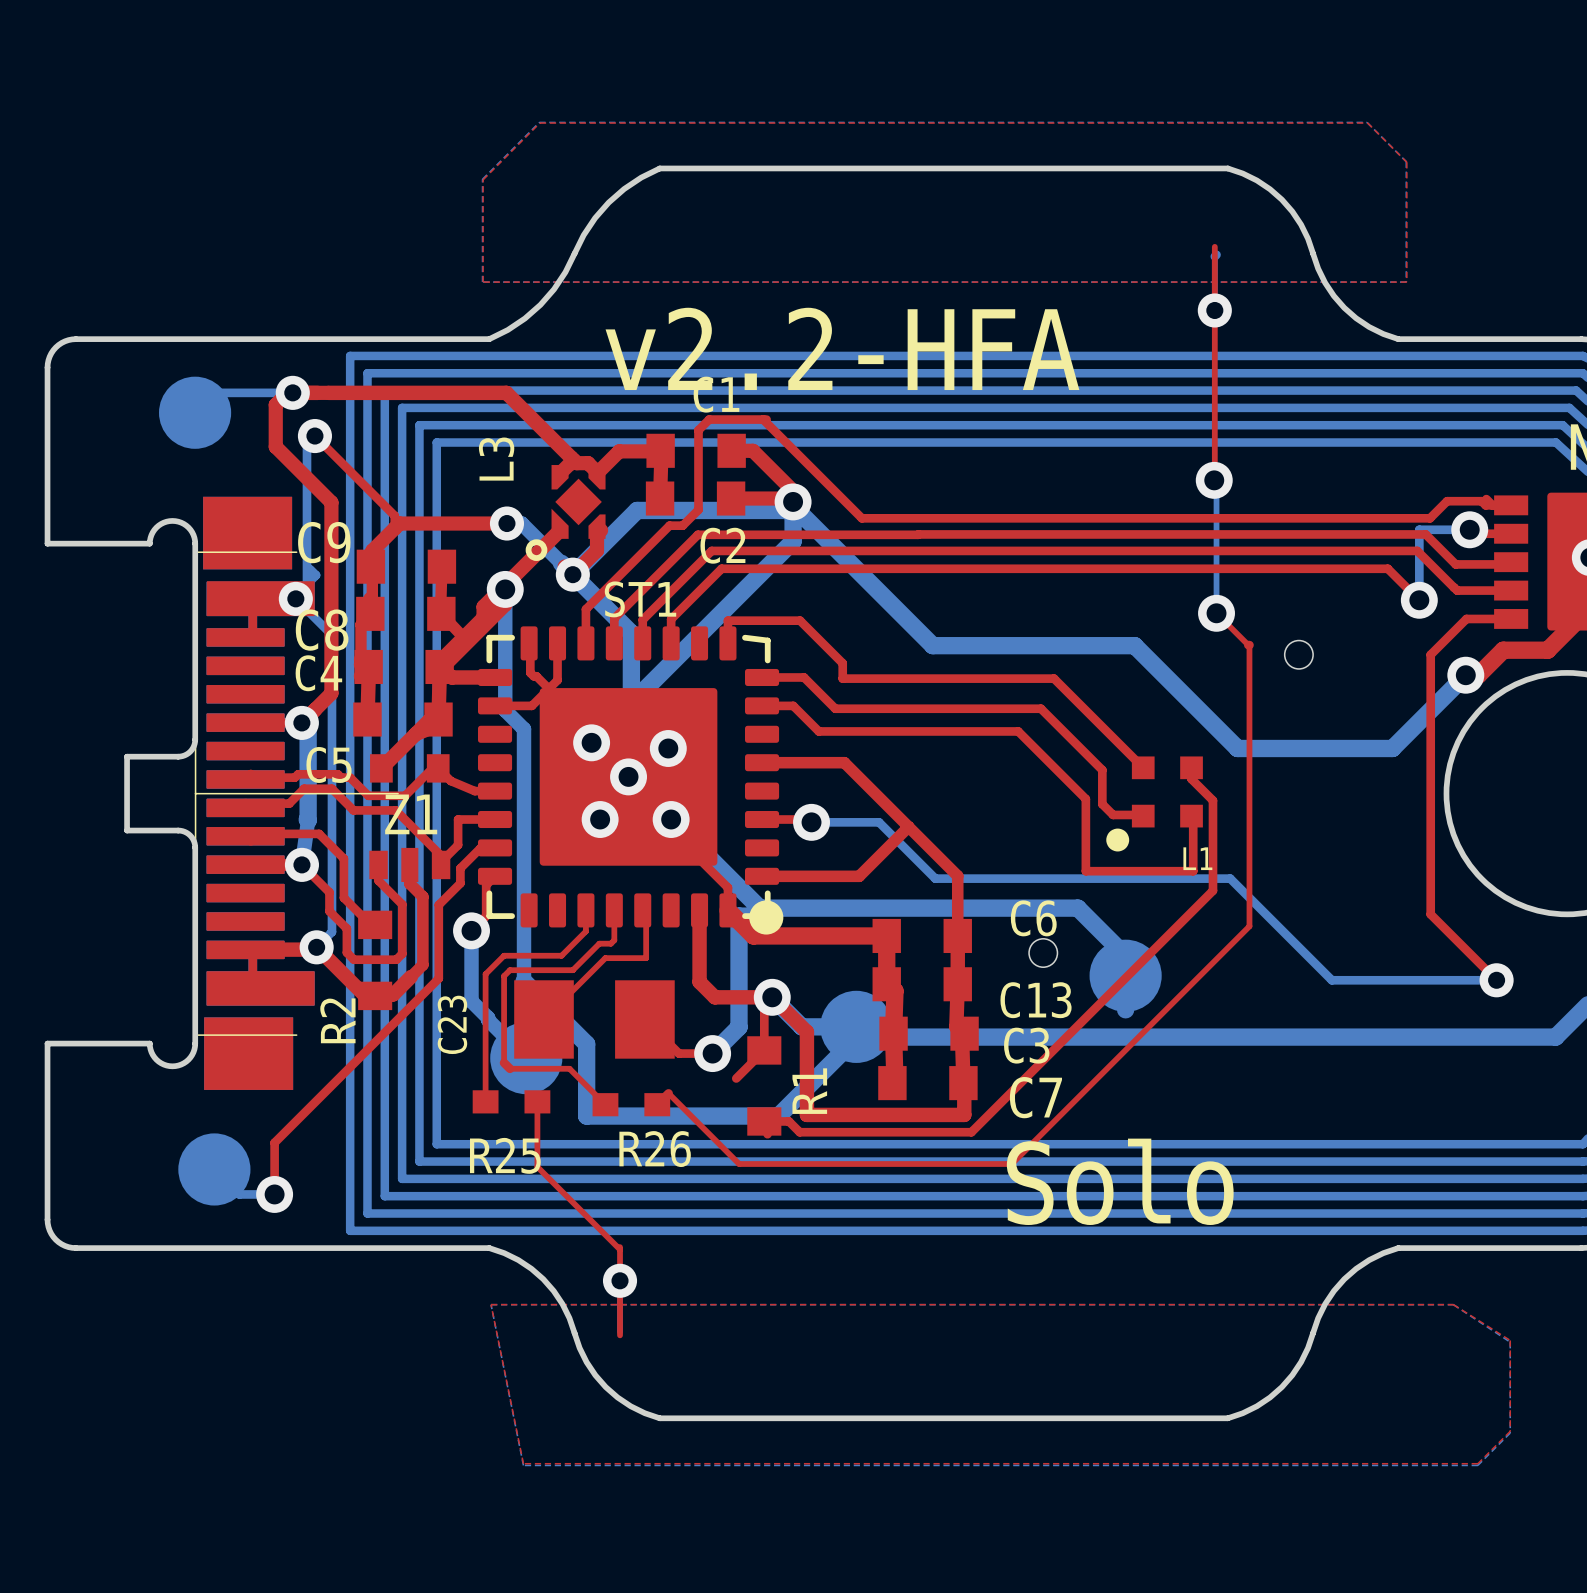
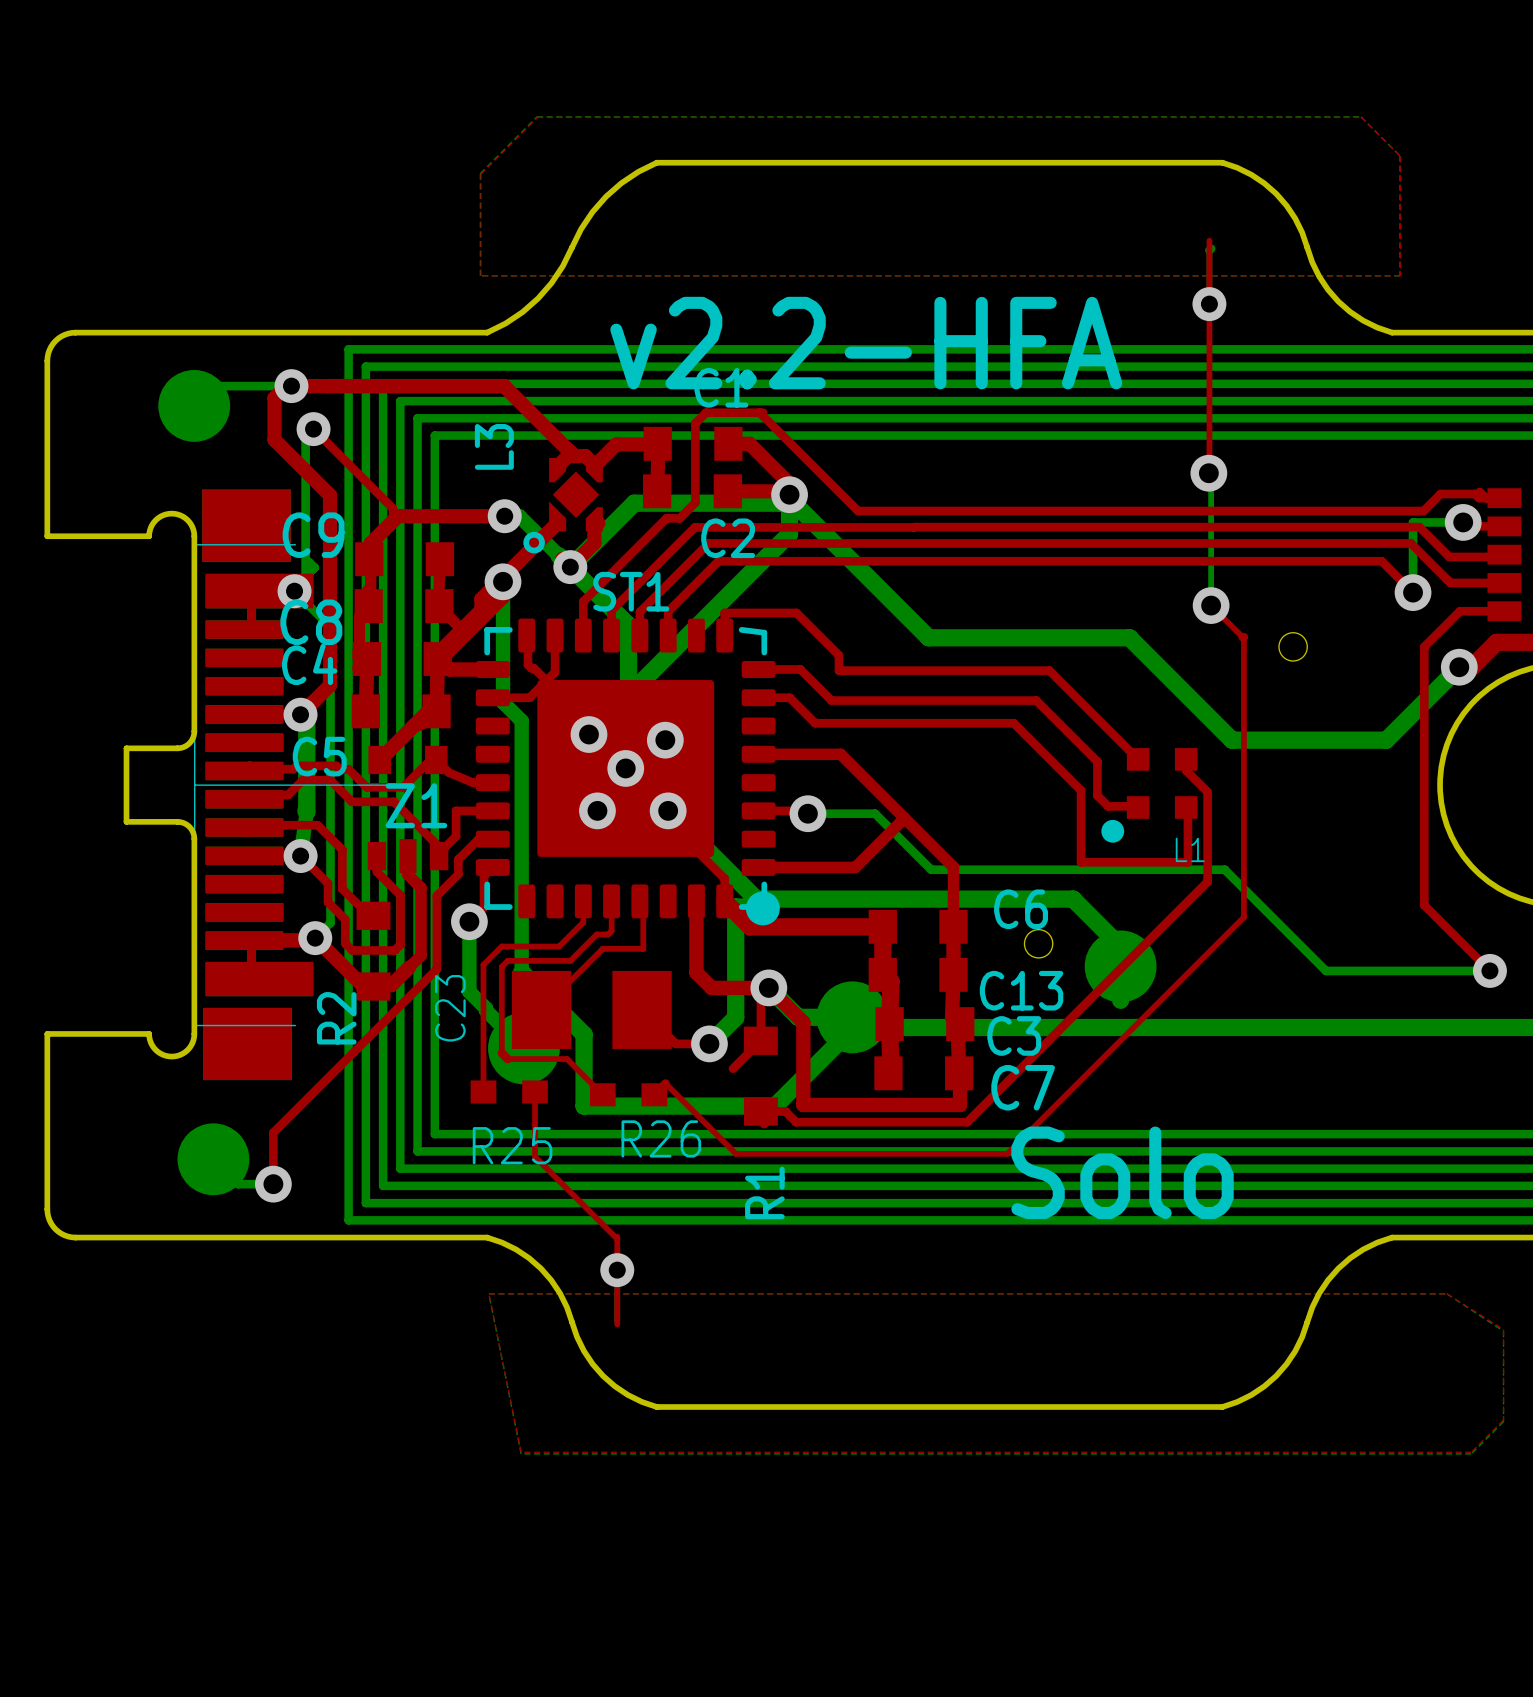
R1 name position: R1 (809, 1091) -> R1 (764, 1192)

